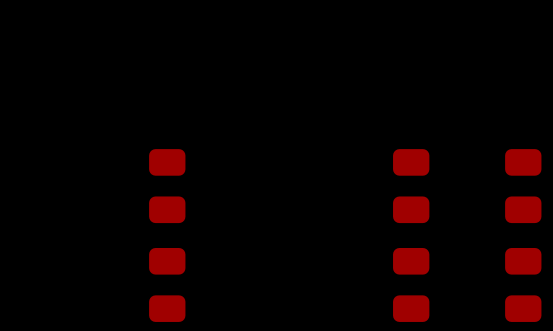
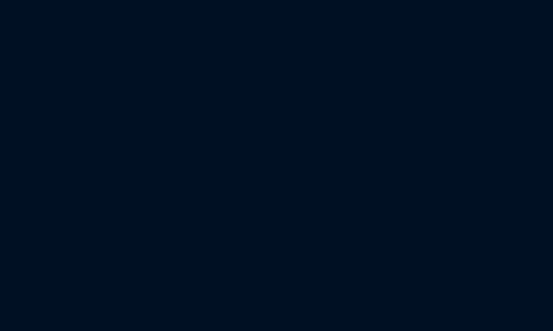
part: (167, 186) -> none
part: (411, 186) -> none
part: (523, 186) -> none
part: (167, 284) -> none
part: (411, 284) -> none
part: (523, 284) -> none

